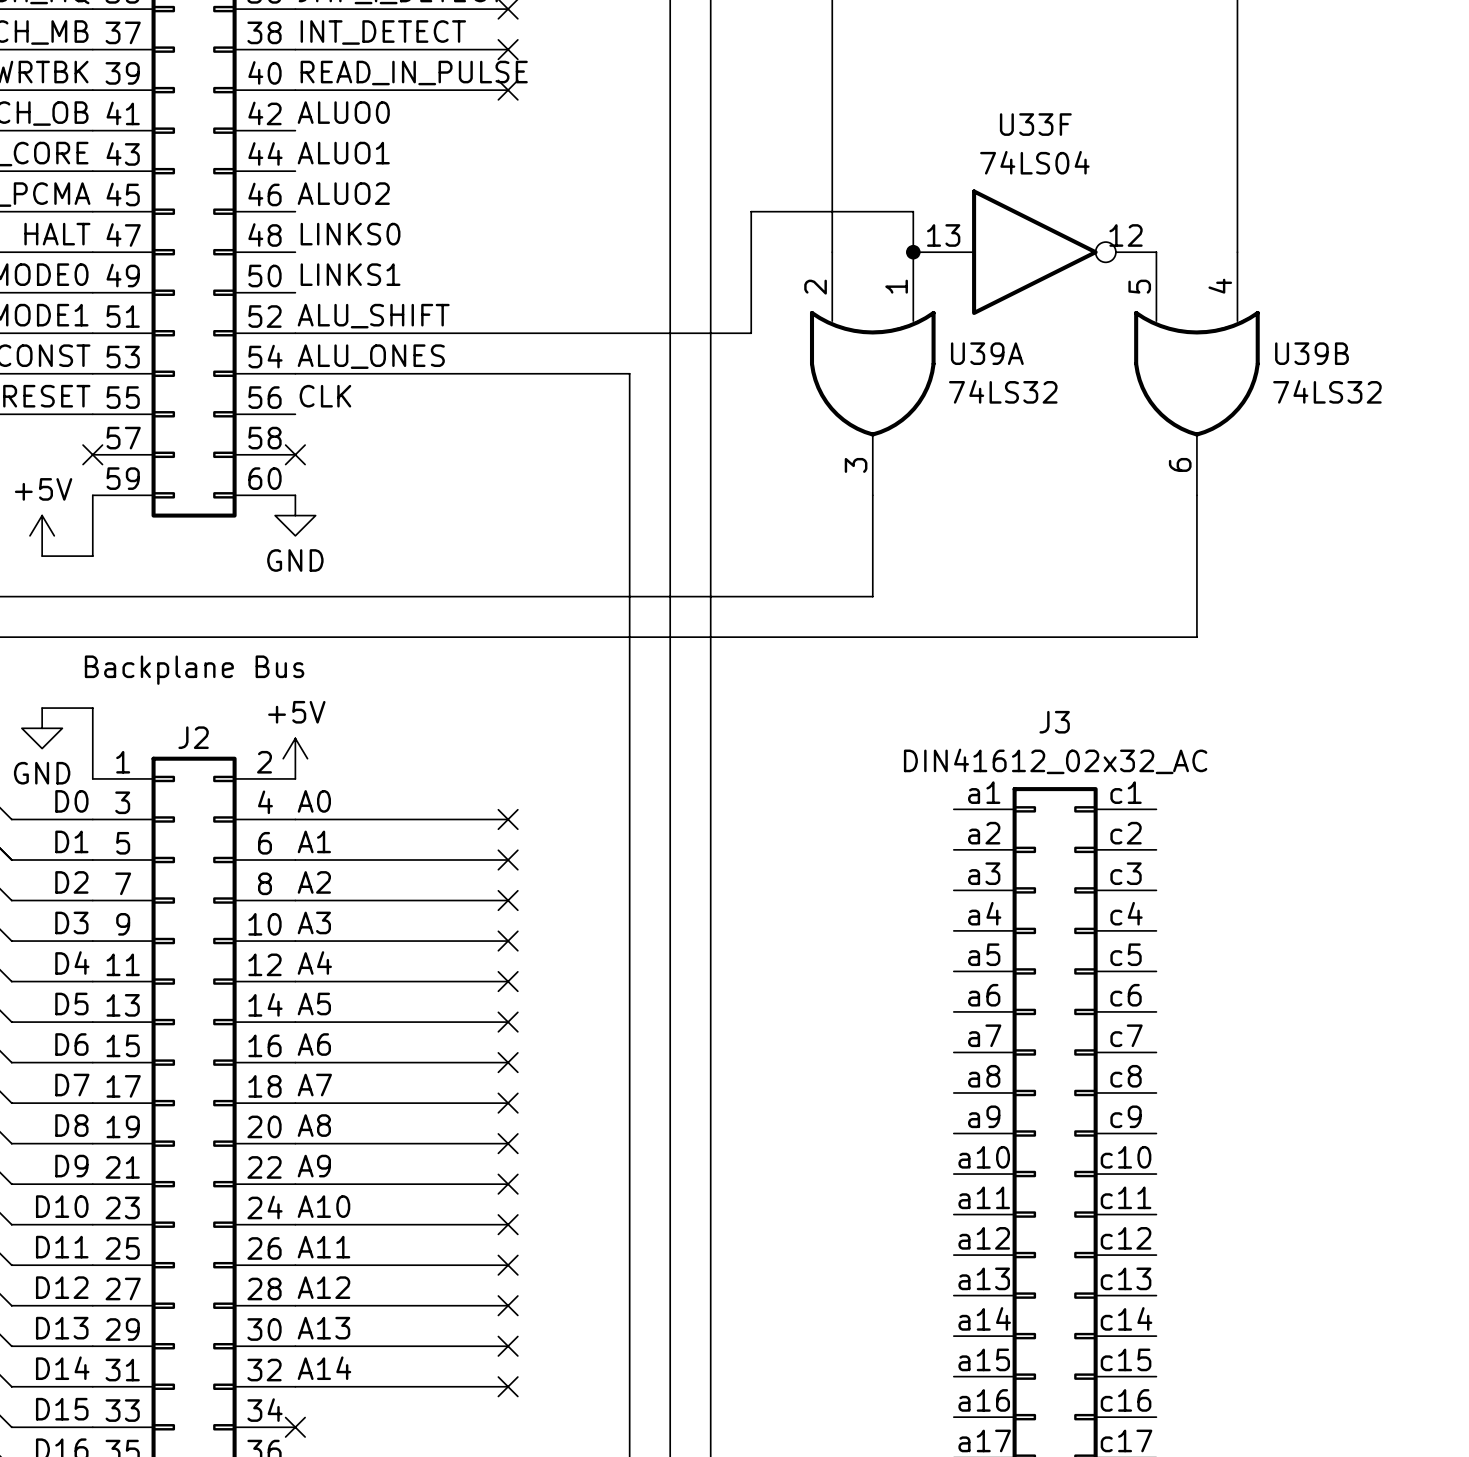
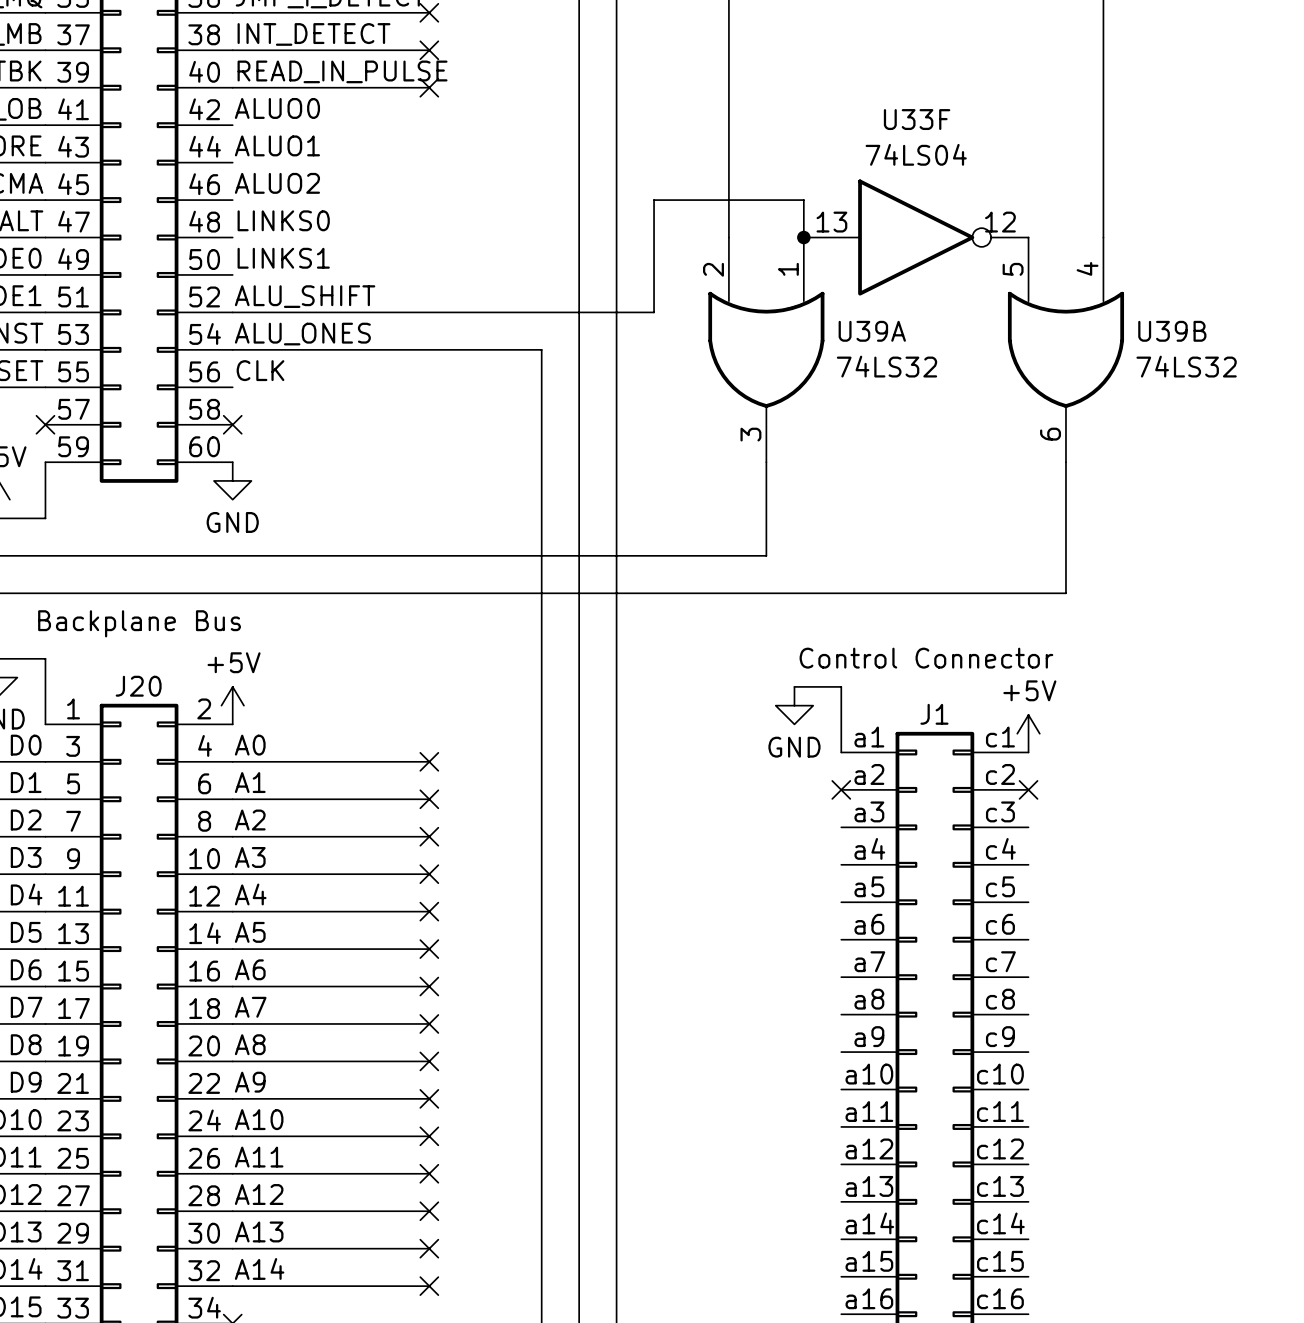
J3 name: J3 (1054, 722) -> J1 (934, 714)
J2 name: J2 (193, 737) -> J20 (138, 686)
wire: none -> (794, 686) (841, 686) (841, 752)
power symbol: none -> GND (794, 705)
J3 value: DIN41612_02x32_AC (1055, 761) -> Control Connector (926, 658)
power symbol: none -> +5V (1028, 733)
no-connect mark: none -> (841, 789)
no-connect mark: none -> (1028, 789)

